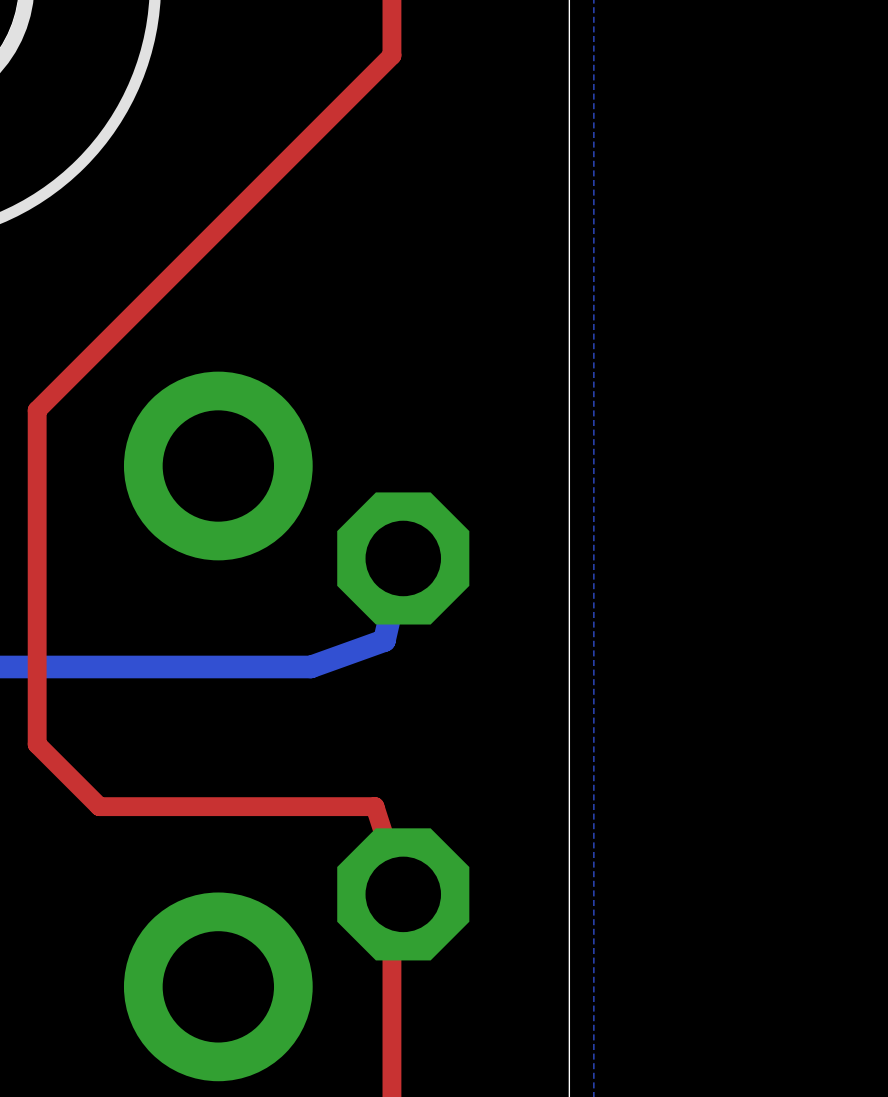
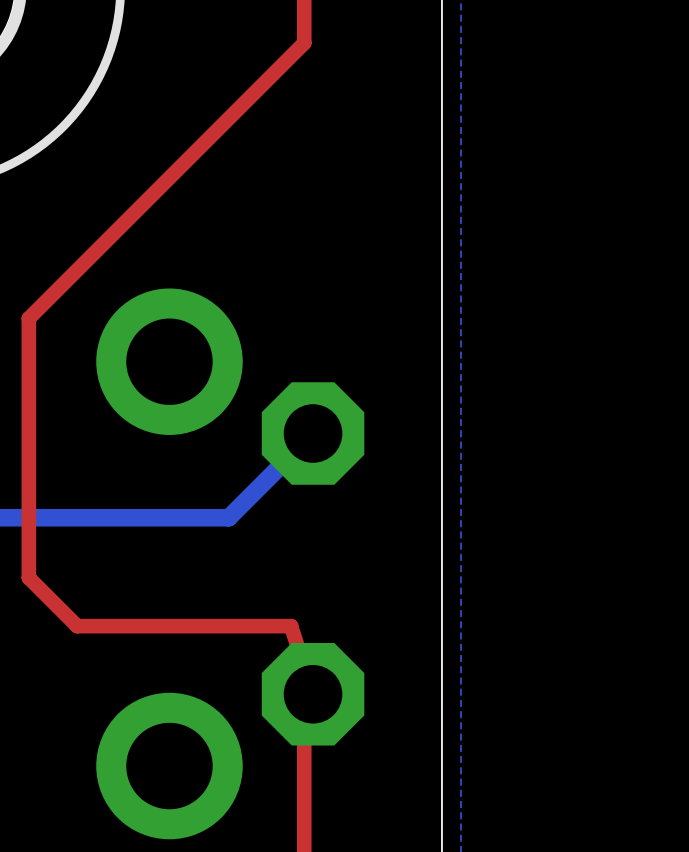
bottom track: (403, 558) (384, 640) (310, 666) (294, 666) -> (313, 433) (228, 517)

